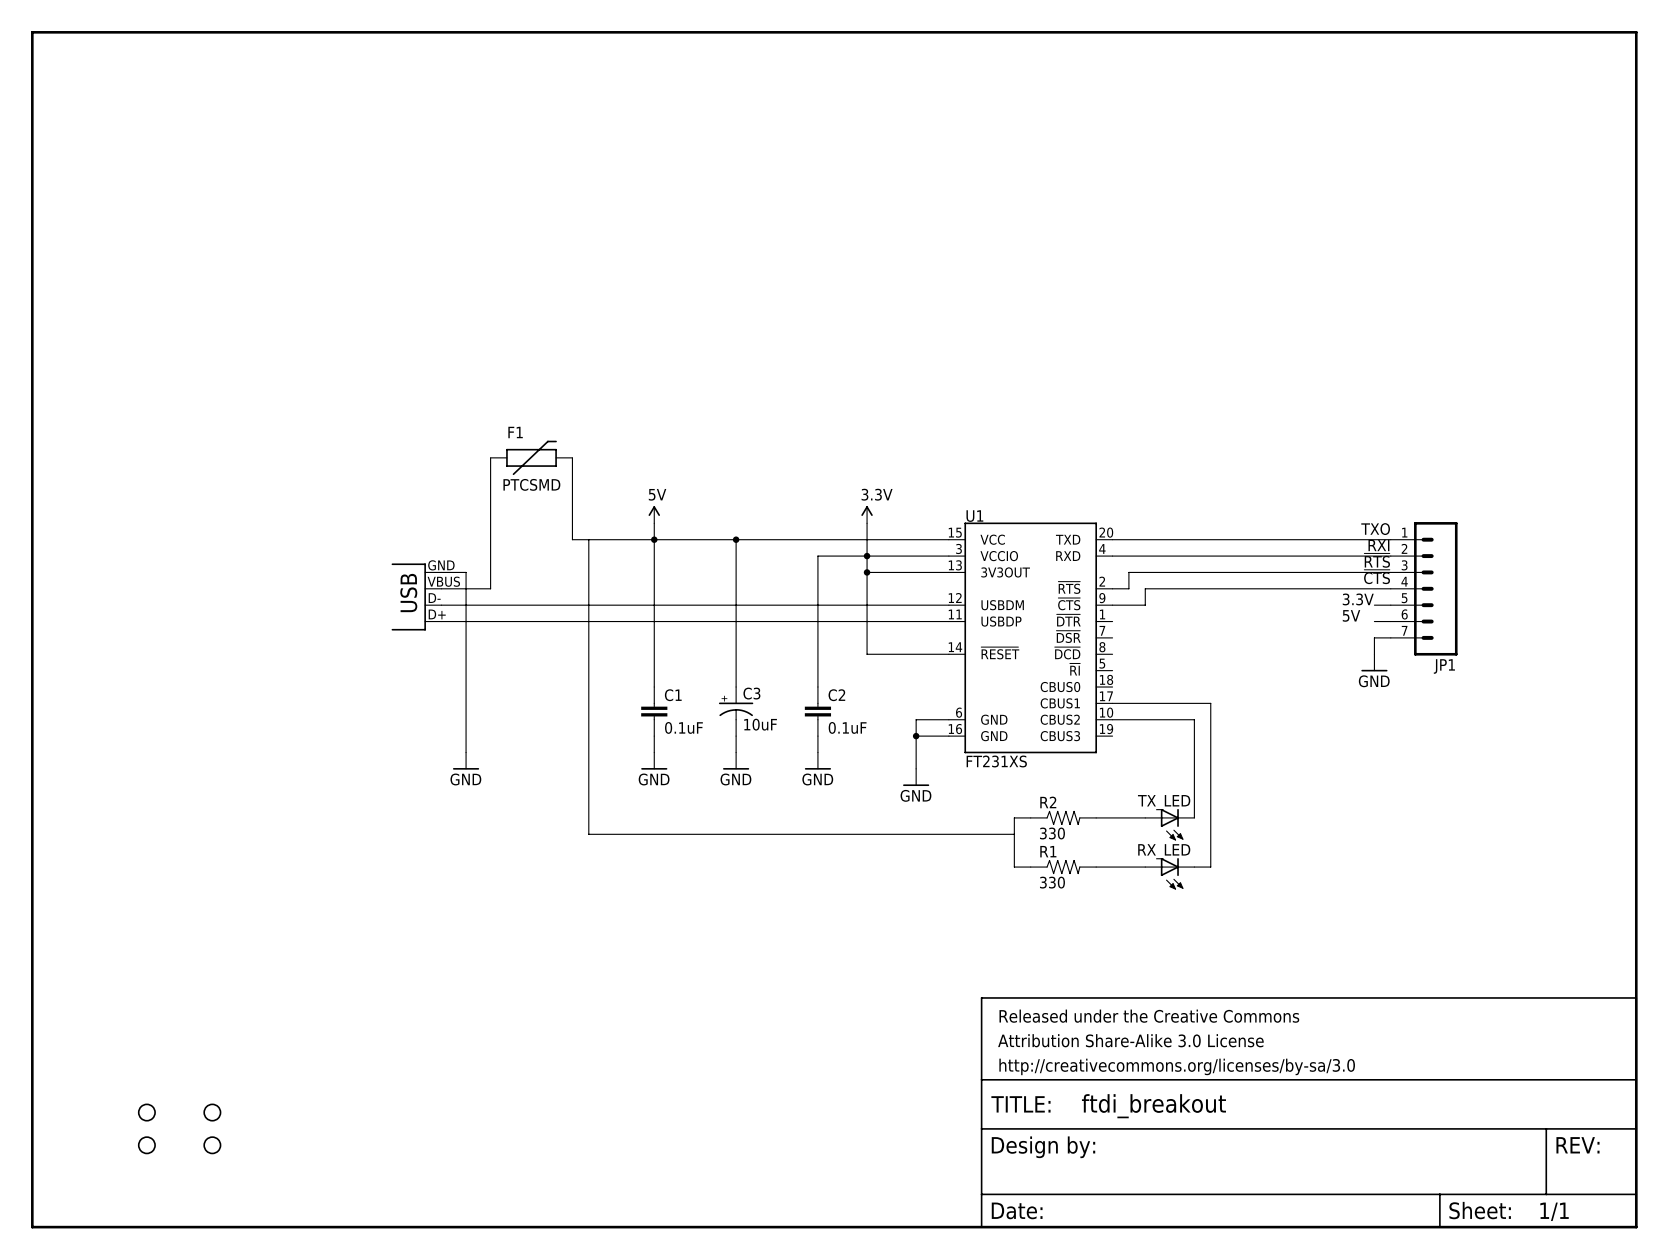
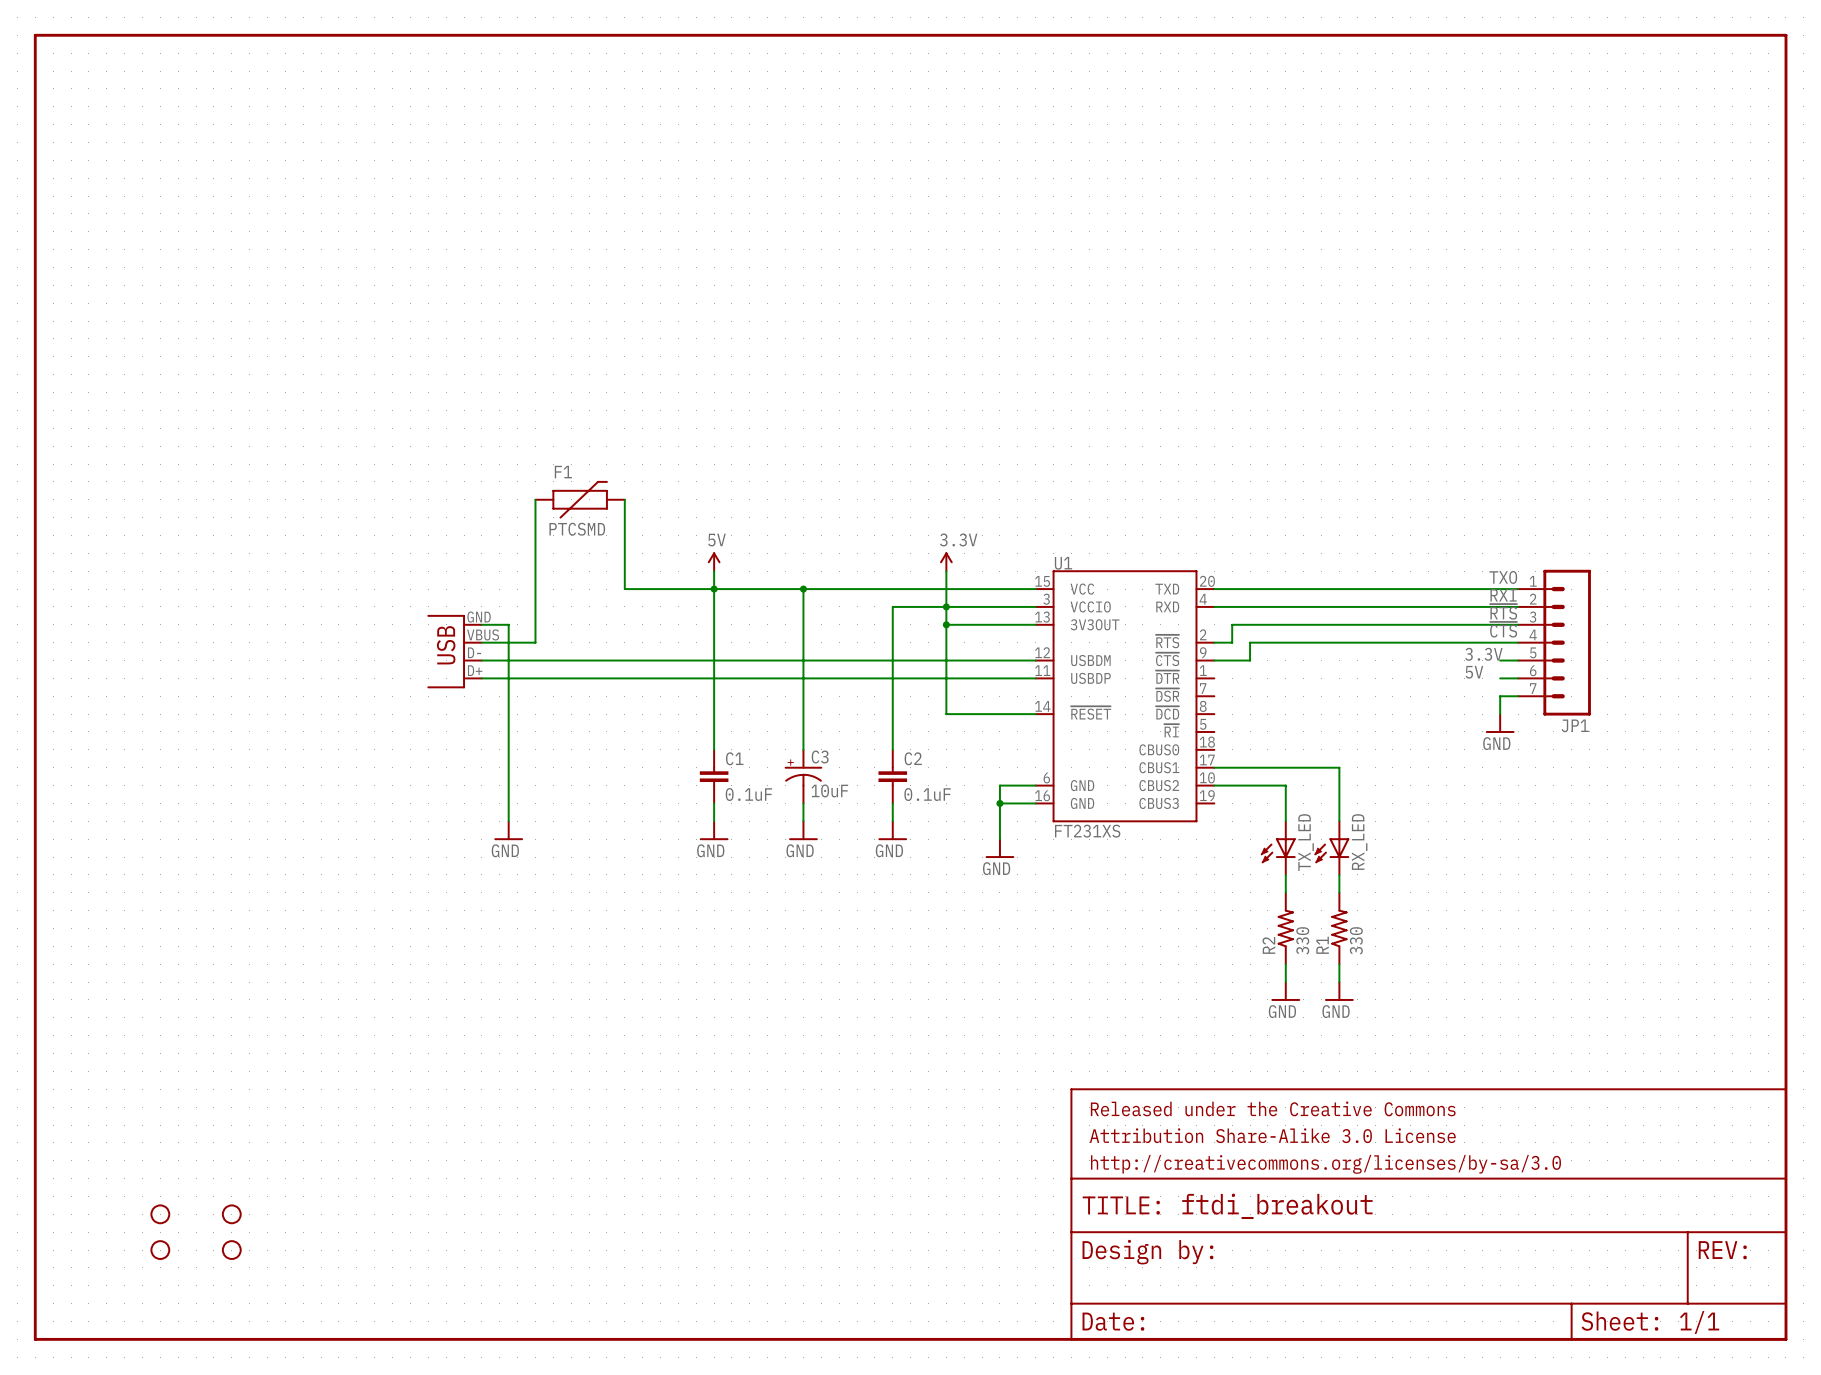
wire: (588, 539) (588, 834) (1014, 834) -> none
wire: (1210, 703) (1210, 867) (1194, 867) -> (1321, 767) (1339, 767) (1339, 821)
wire: (1178, 719) (1194, 719) (1194, 817) -> (1285, 785) (1285, 821)
wire: none -> (1339, 874) (1339, 892)
wire: (1030, 817) (1014, 817) (1014, 867) (1030, 867) -> none
R2 rotation: 0° (1063, 817) -> 90° counterclockwise (1285, 928)
R2 position: (1063, 817) -> (1285, 928)
wire: (1096, 817) (1145, 817) -> none
TX_LED position: (1169, 824) -> (1278, 848)
TX_LED rotation: 0° (1172, 824) -> 90° clockwise (1278, 850)
R1 rotation: 0° (1063, 867) -> 90° counterclockwise (1339, 928)
R1 position: (1063, 867) -> (1339, 928)
wire: (1096, 867) (1145, 867) -> none
RX_LED position: (1169, 873) -> (1331, 848)
RX_LED rotation: 0° (1172, 873) -> 90° clockwise (1331, 850)
wire: none -> (1285, 964) (1285, 982)
wire: none -> (1339, 964) (1339, 982)
power symbol: none -> GND (1285, 991)
power symbol: none -> GND (1339, 991)

